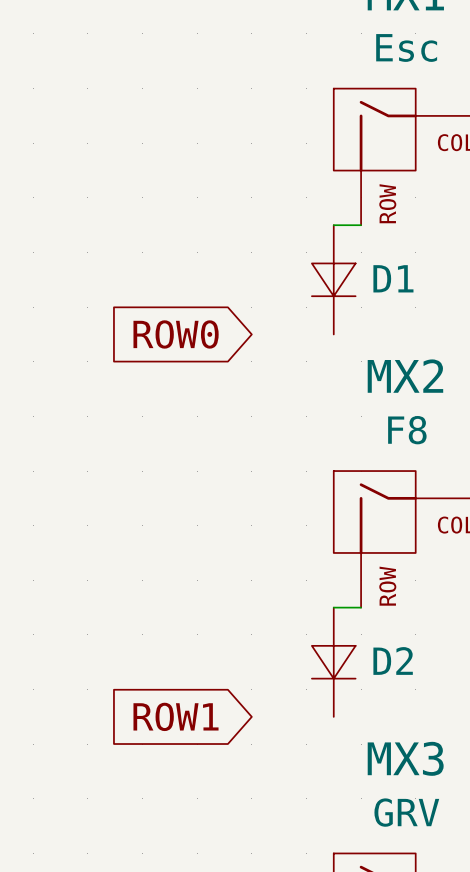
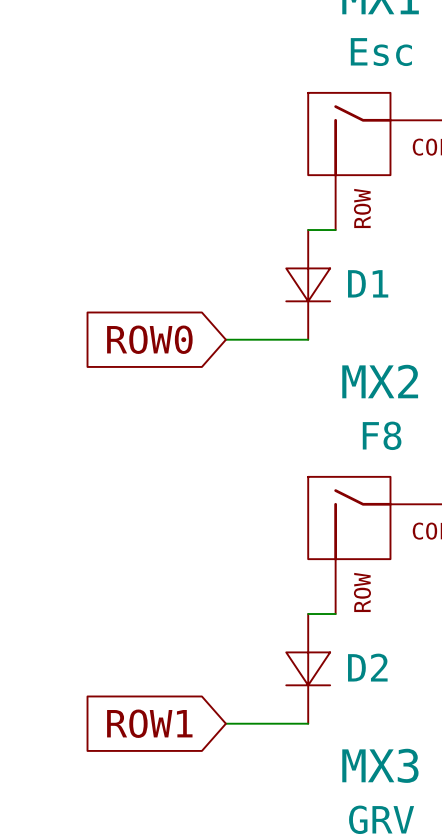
wire: none -> (225, 339) (308, 339)
wire: none -> (225, 723) (308, 723)

